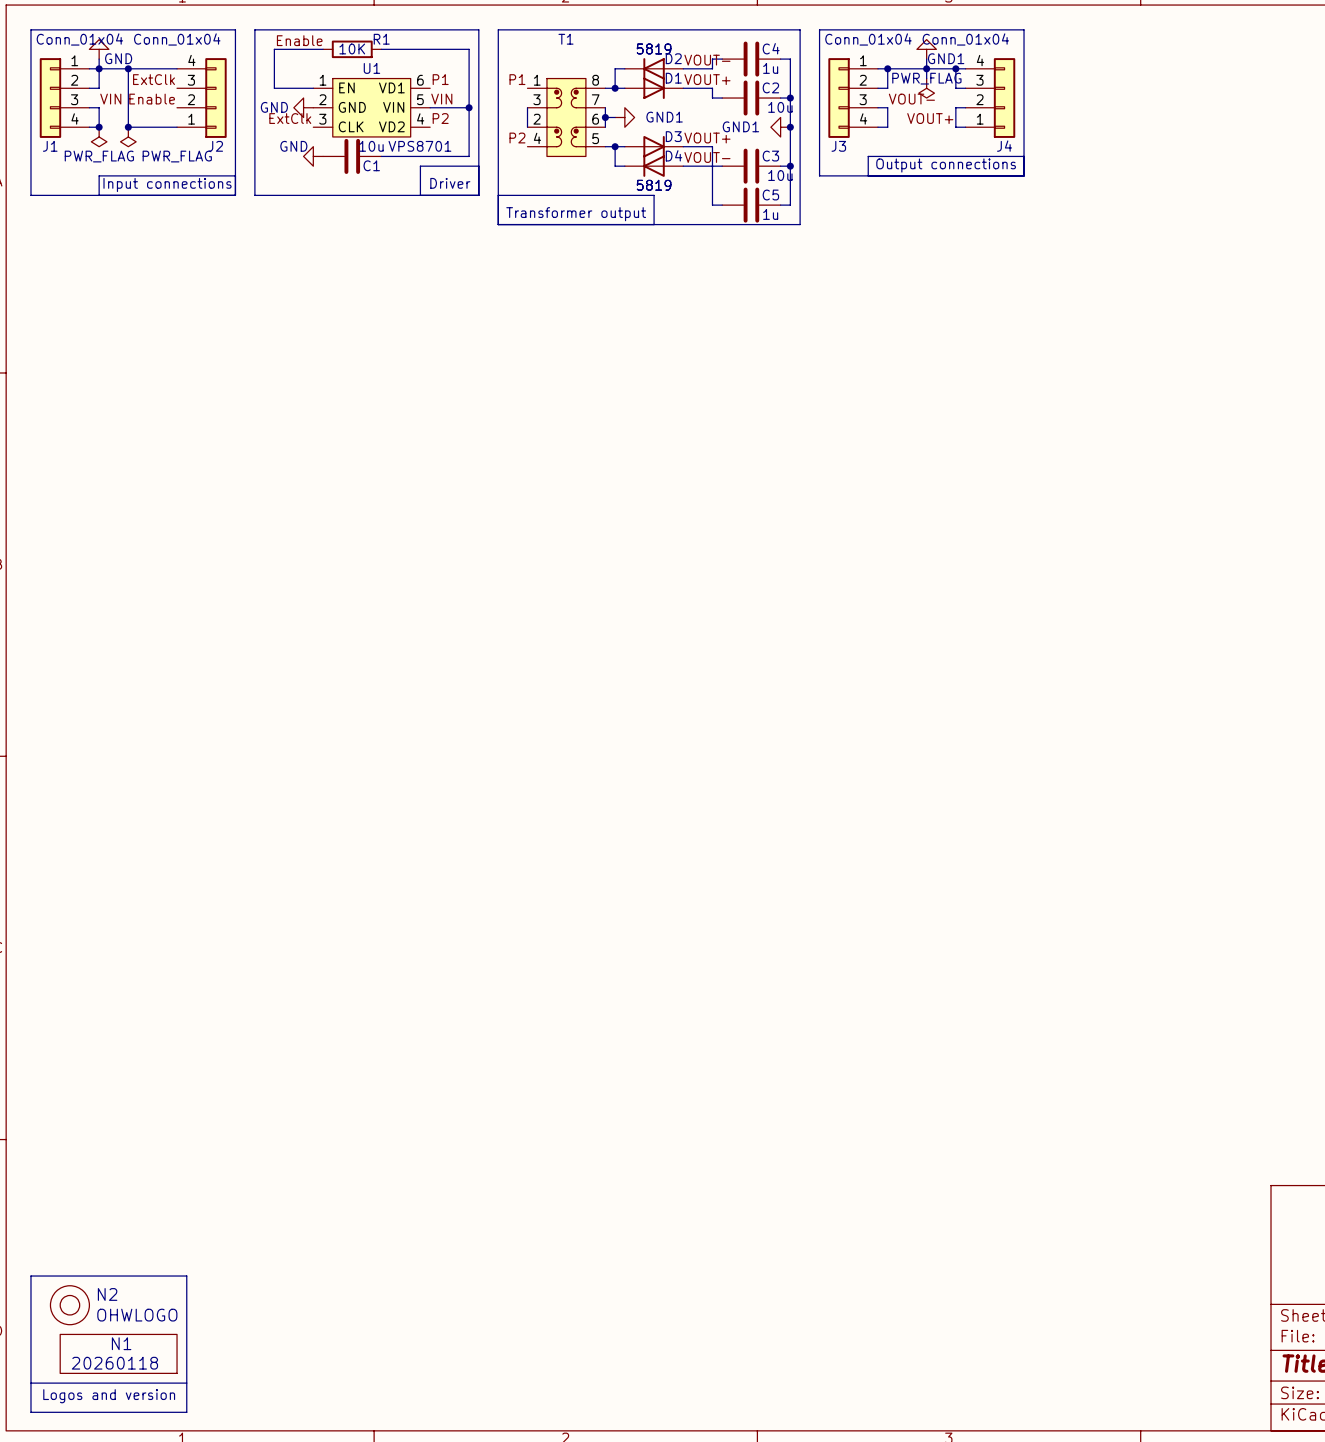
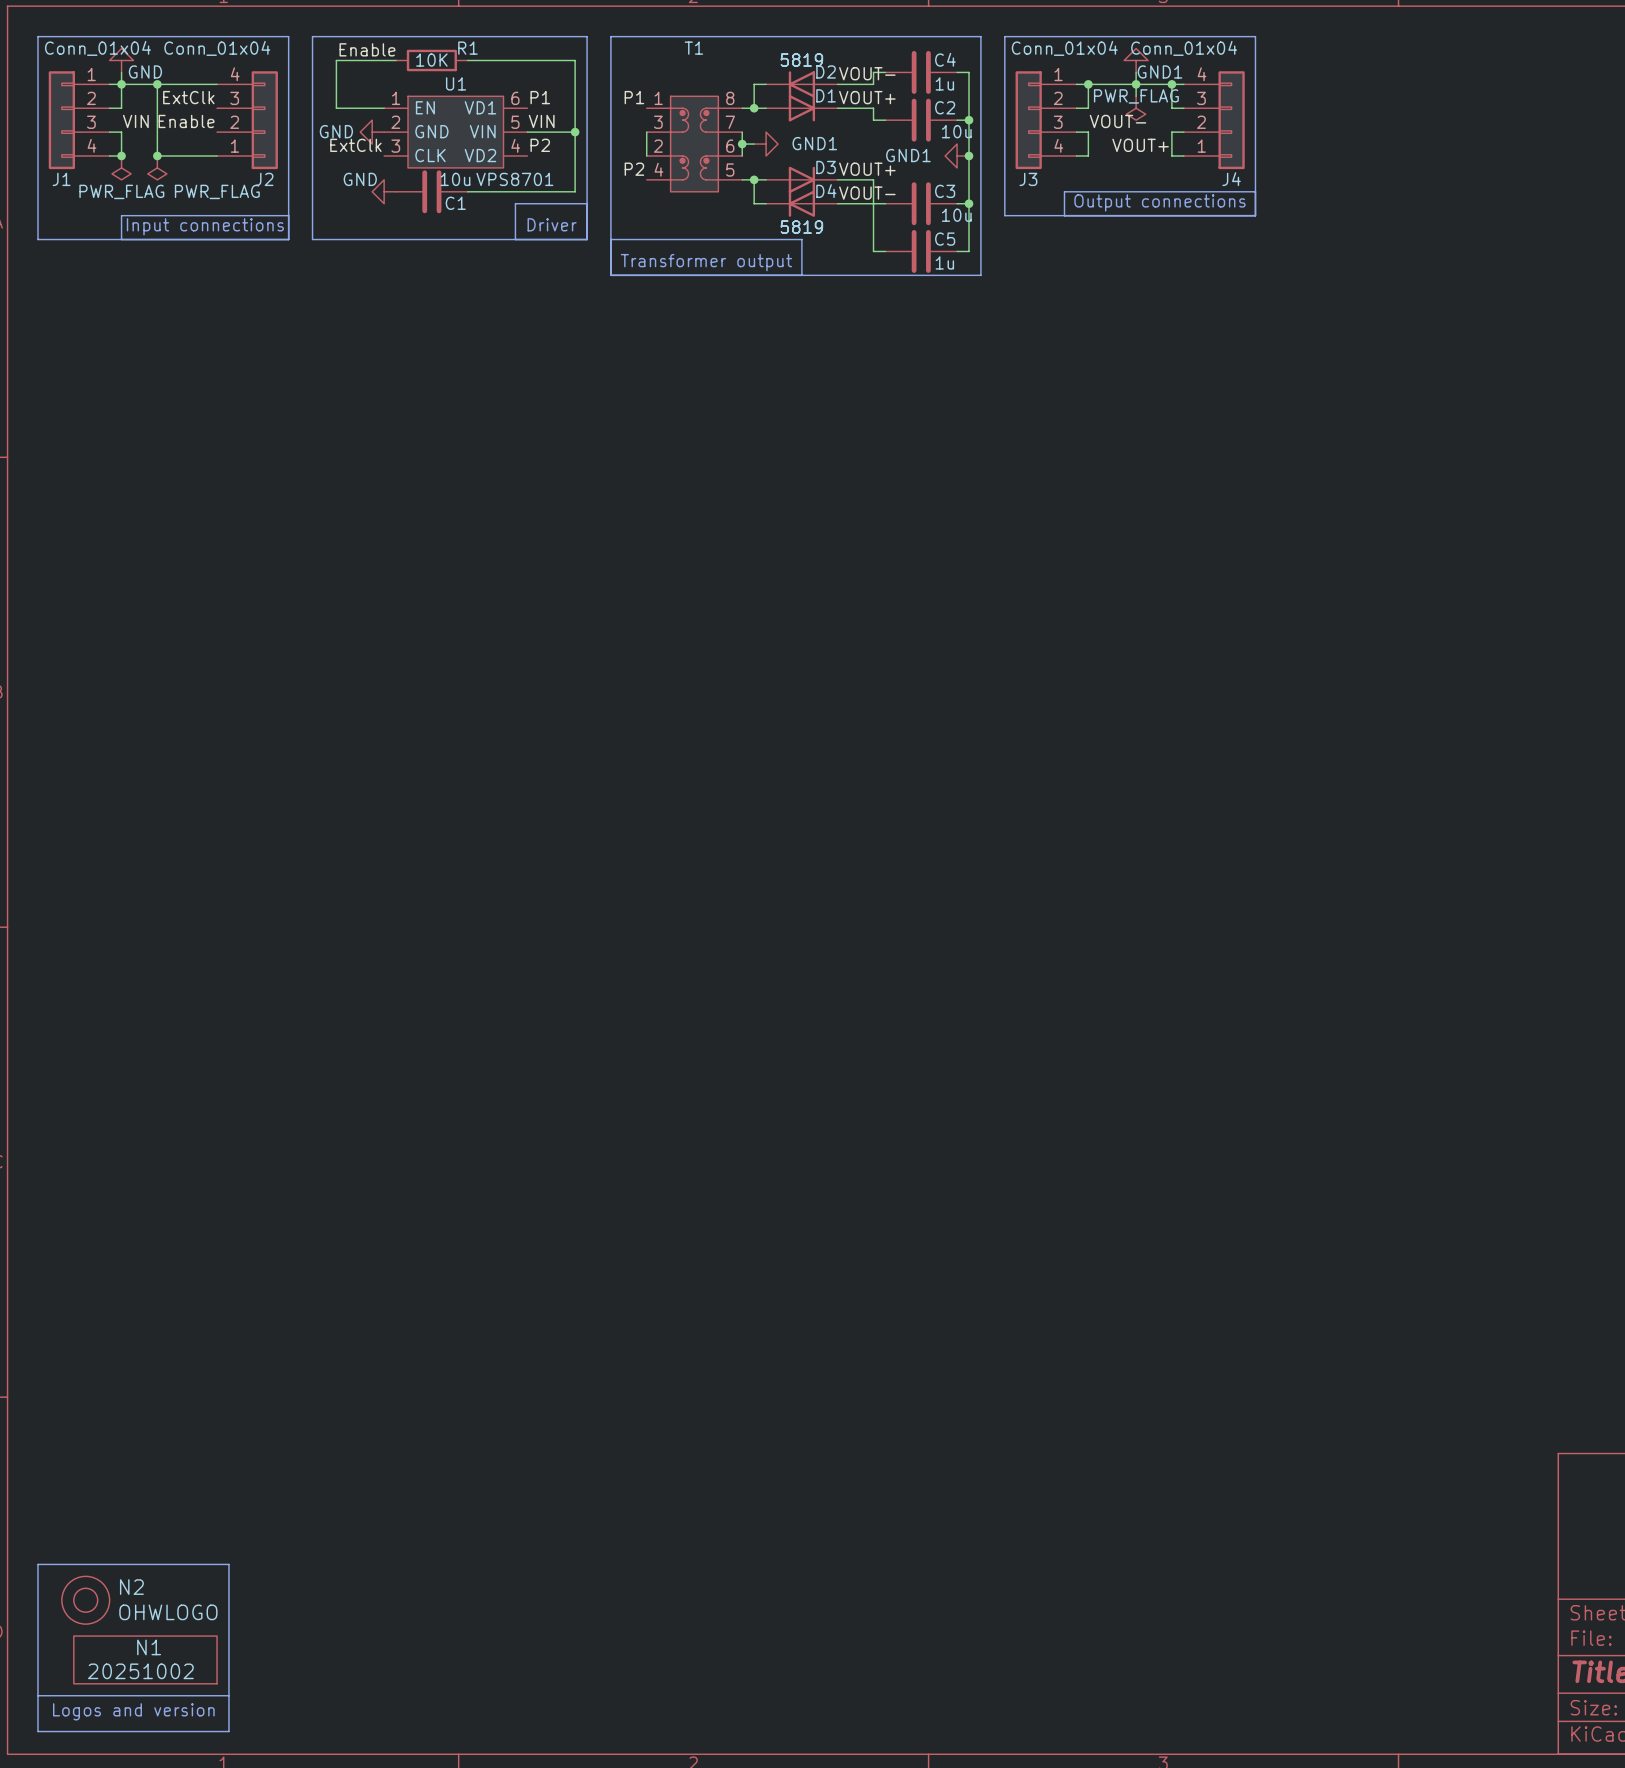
N1 value: 20260118 (114, 1363) -> 20251002 (140, 1671)

